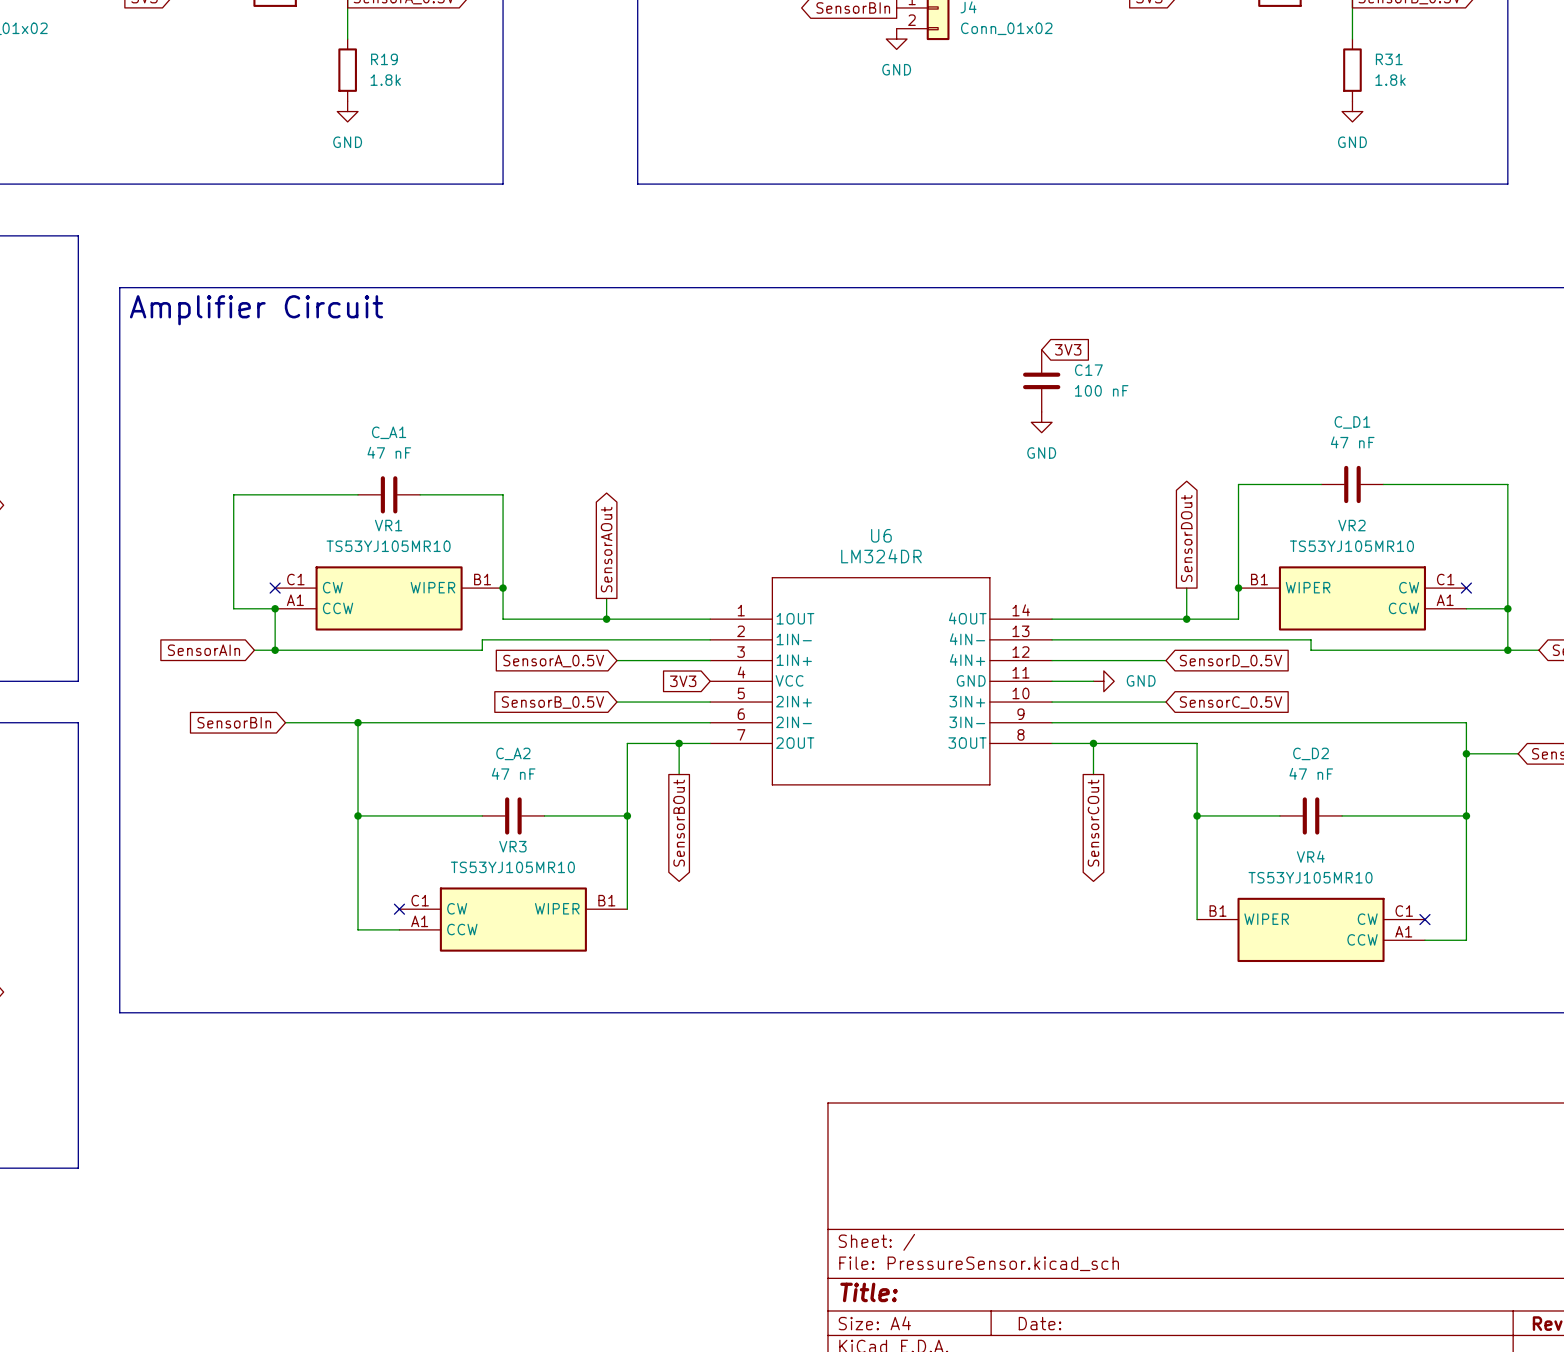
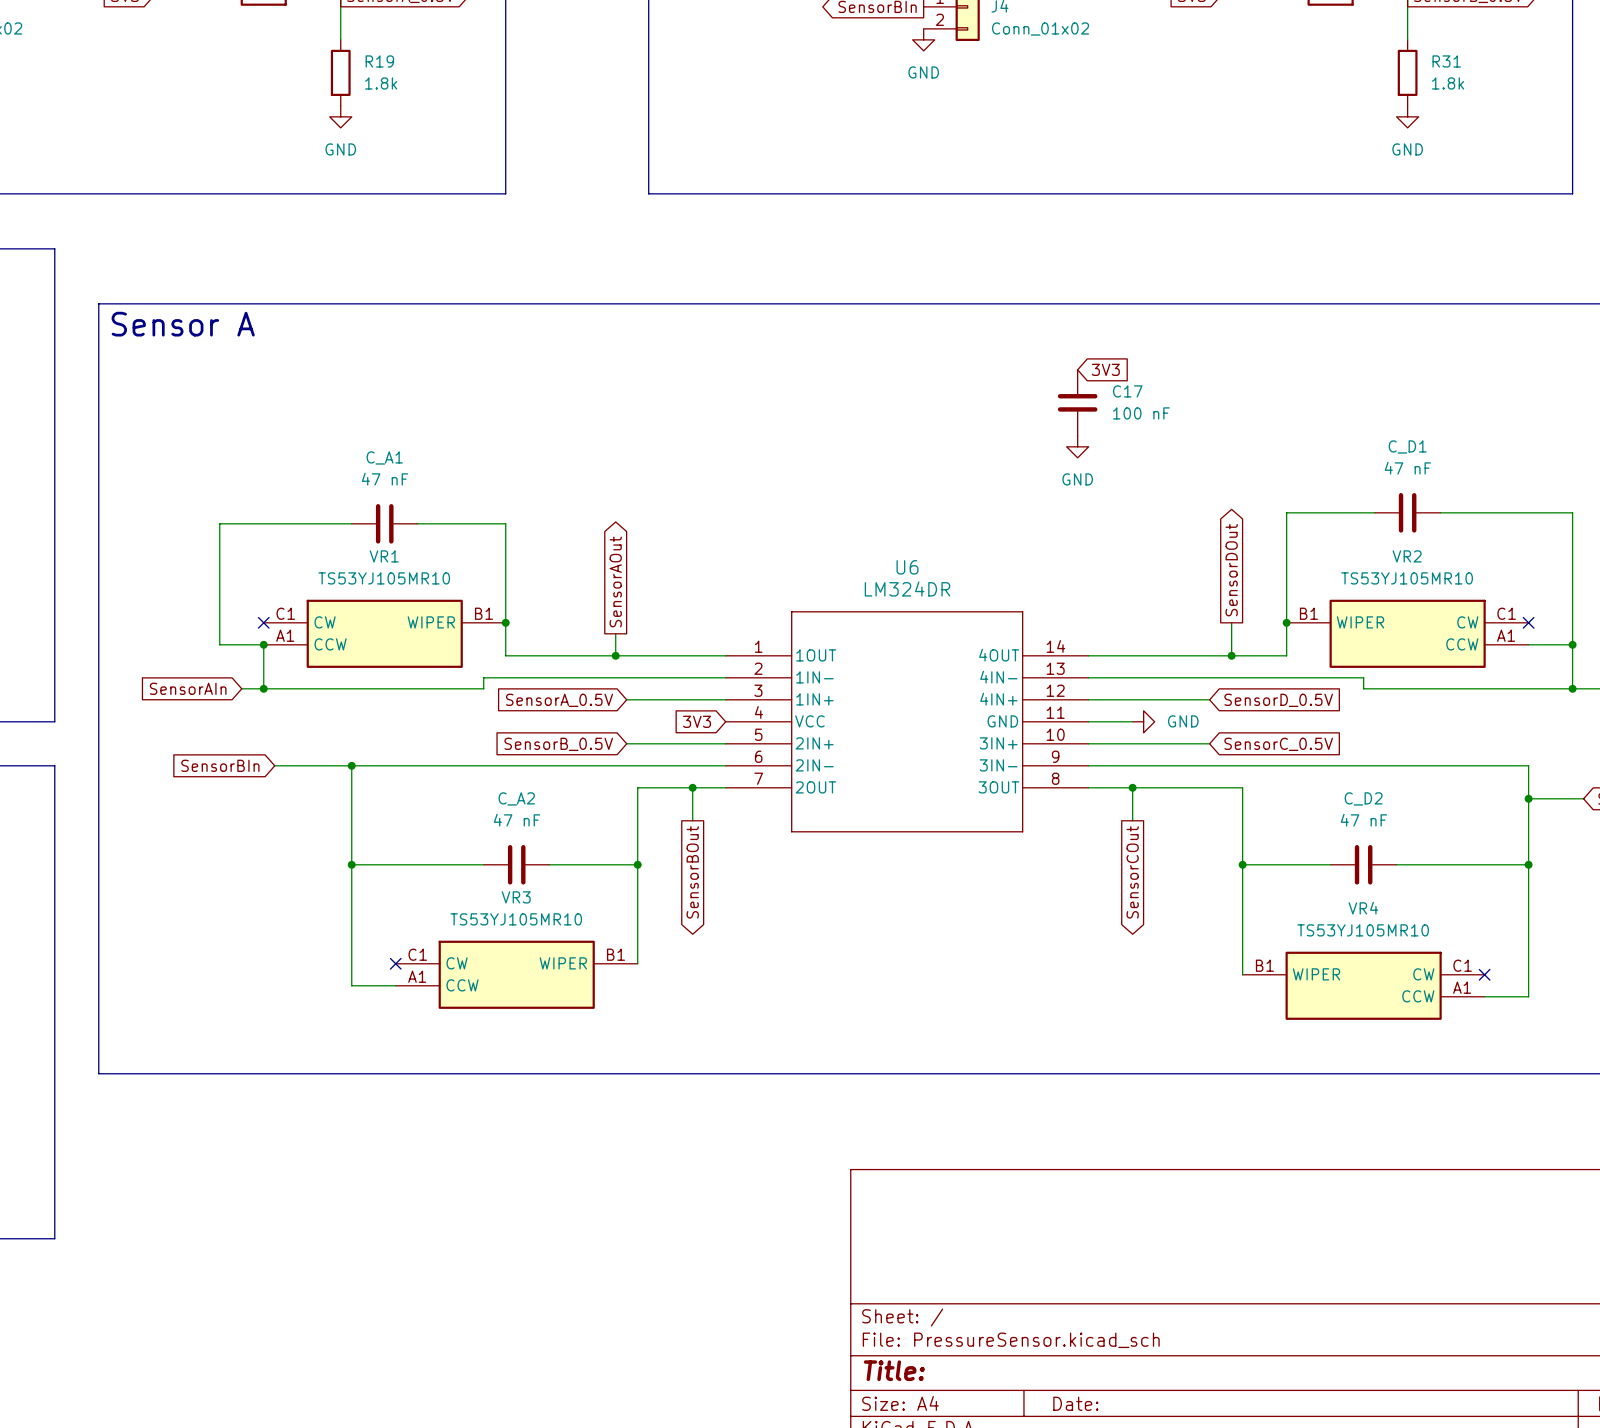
text: Amplifier Circuit (256, 310) -> Sensor A (183, 324)

